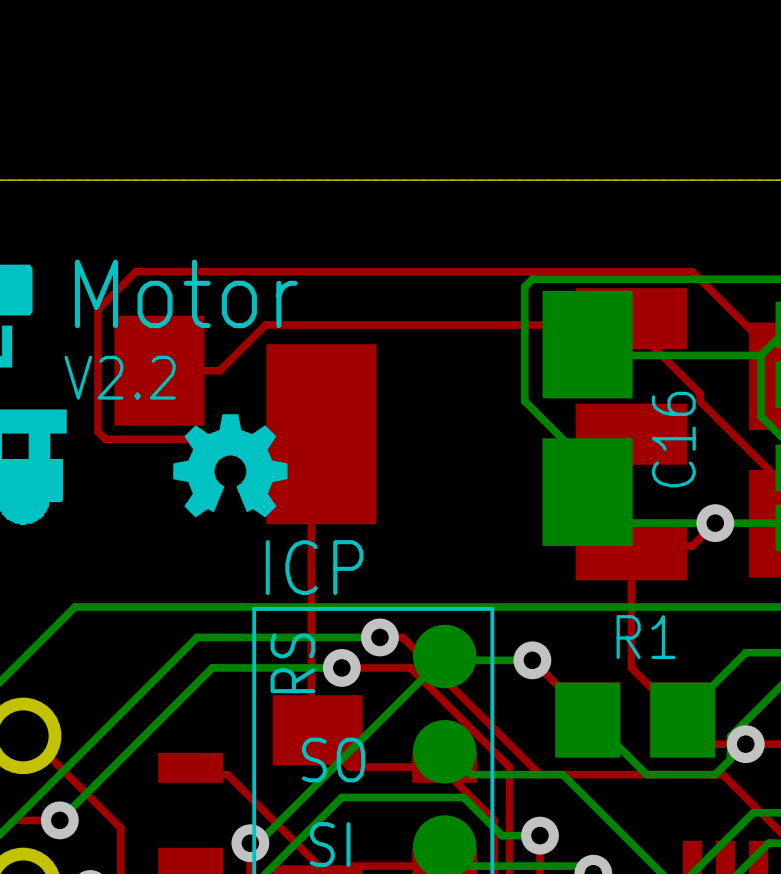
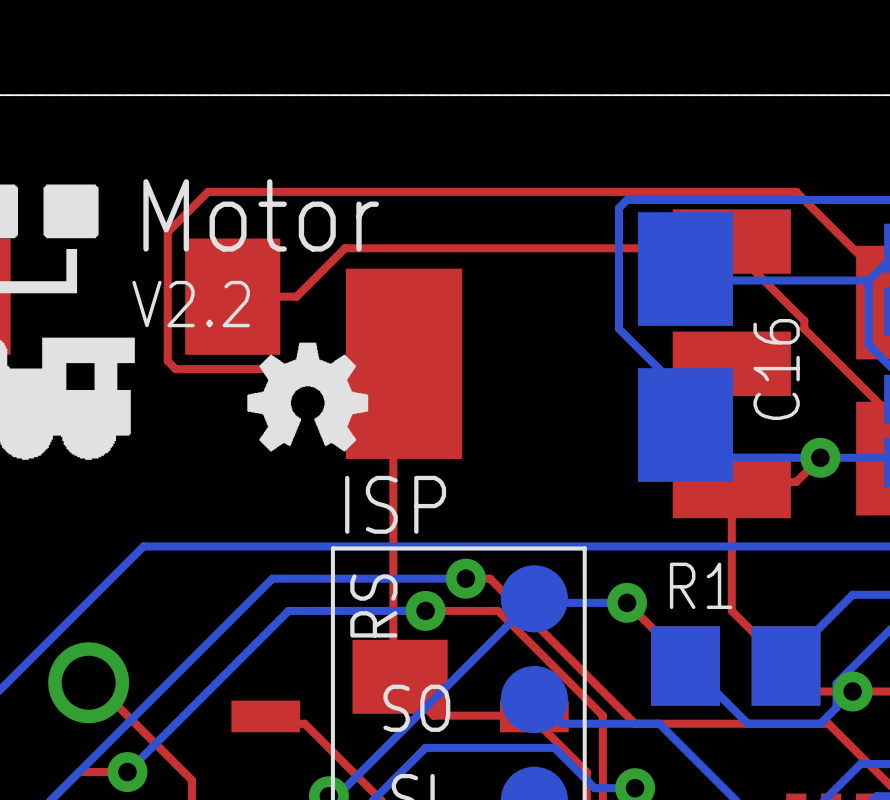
text: ICP (314, 567) -> ISP (395, 504)
R1 name position: R1 (646, 637) -> R1 (701, 585)

